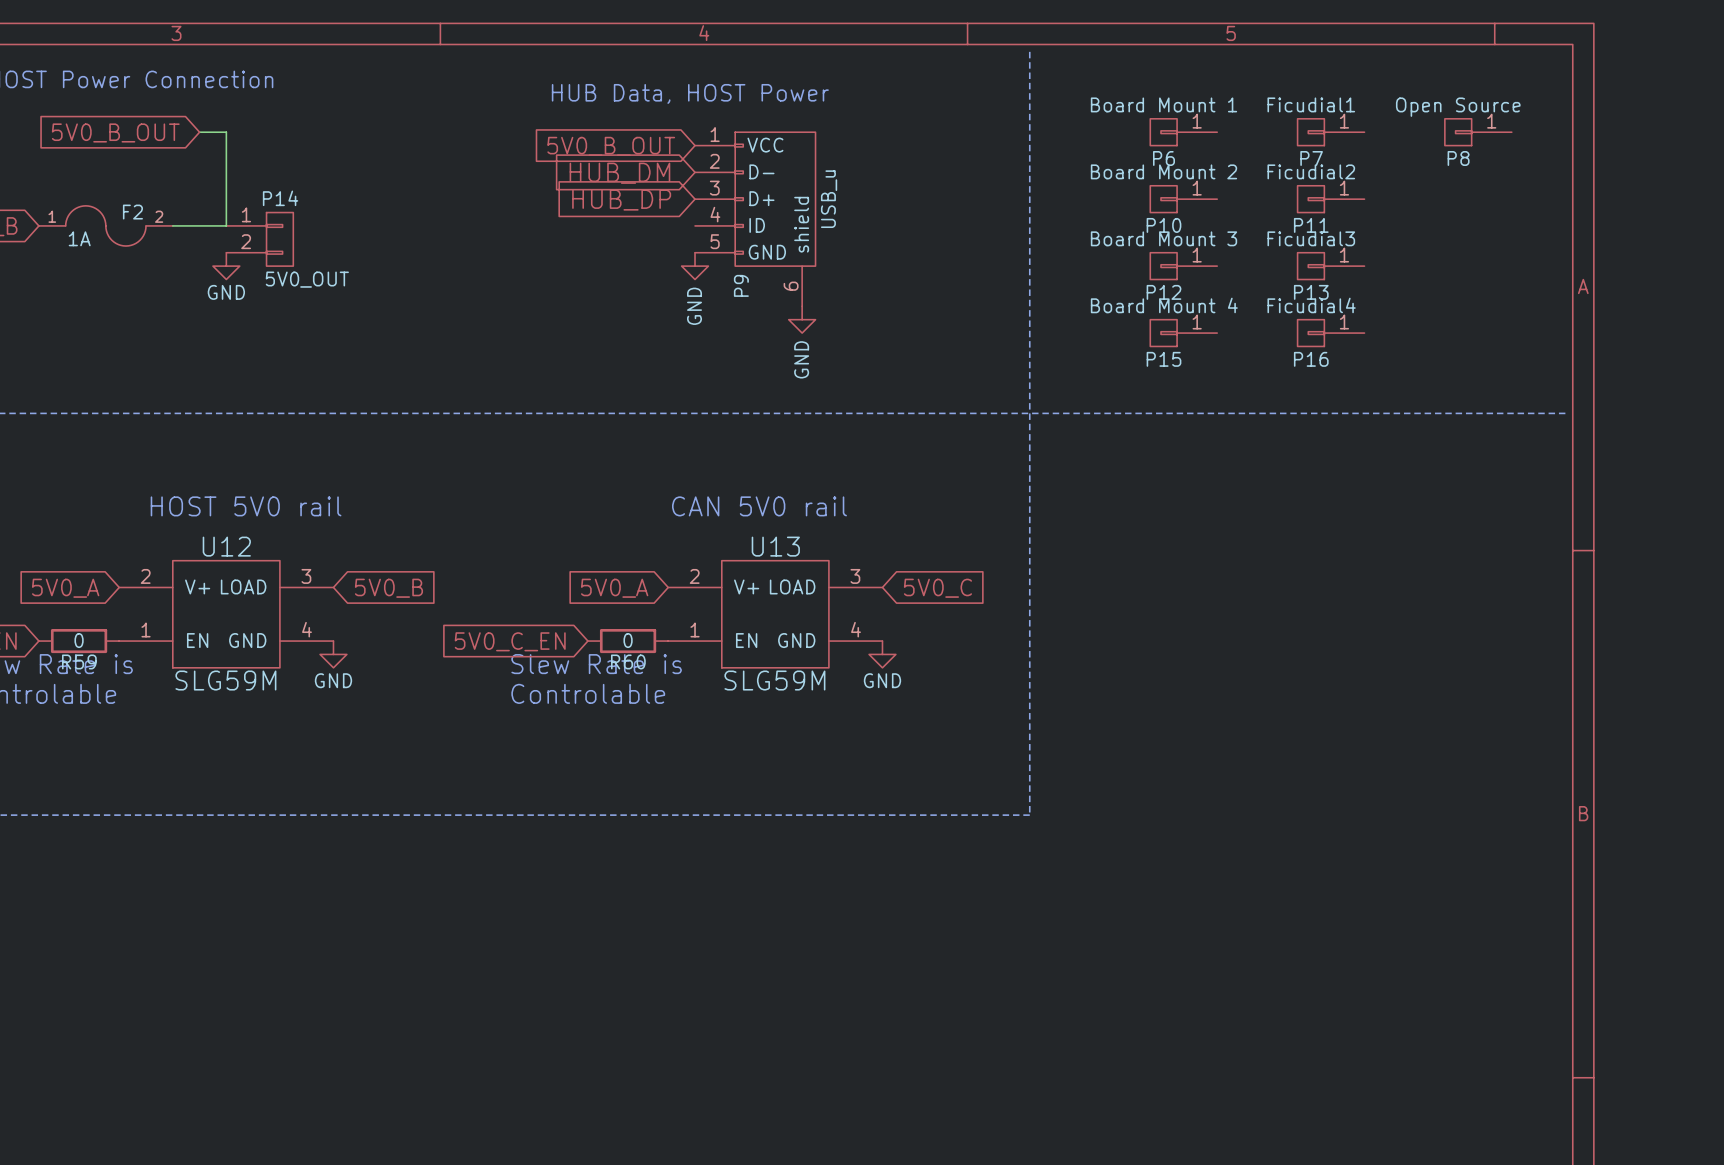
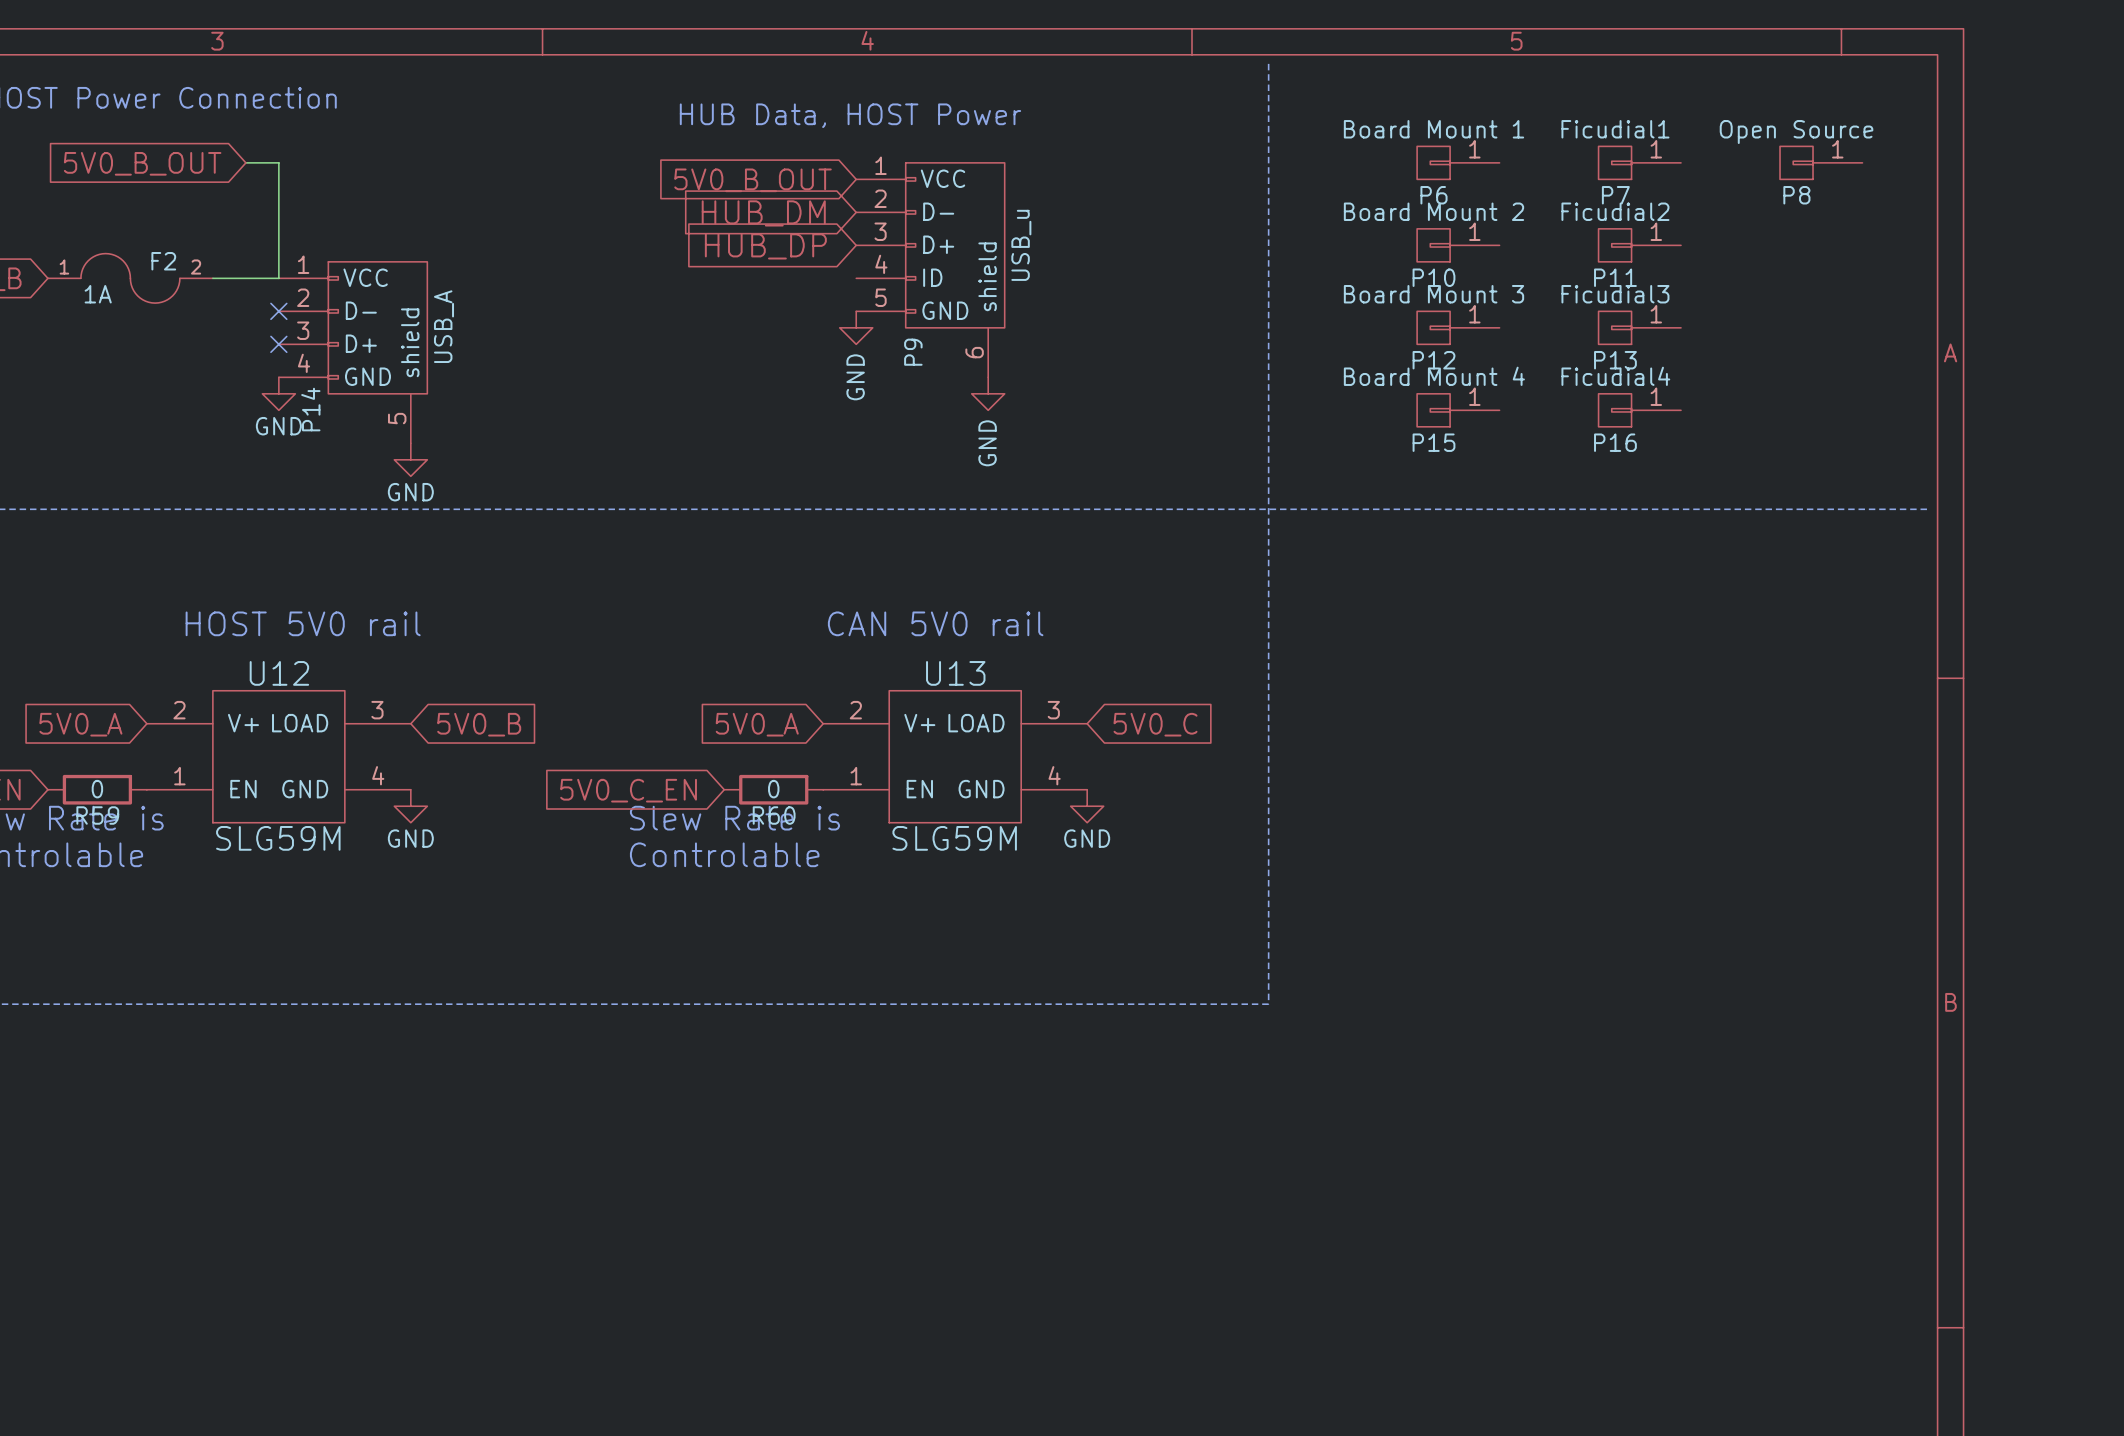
P14 name position: P14 (280, 198) -> P14 (310, 409)
P14 symbol: [226, 212, 294, 267] -> [278, 261, 428, 444]
no-connect mark: none -> (278, 311)
power symbol position: GND (226, 266) -> GND (278, 393)
no-connect mark: none -> (278, 344)
P14 value: 5V0_OUT (307, 279) -> USB_A (443, 326)
power symbol: none -> GND (410, 459)

